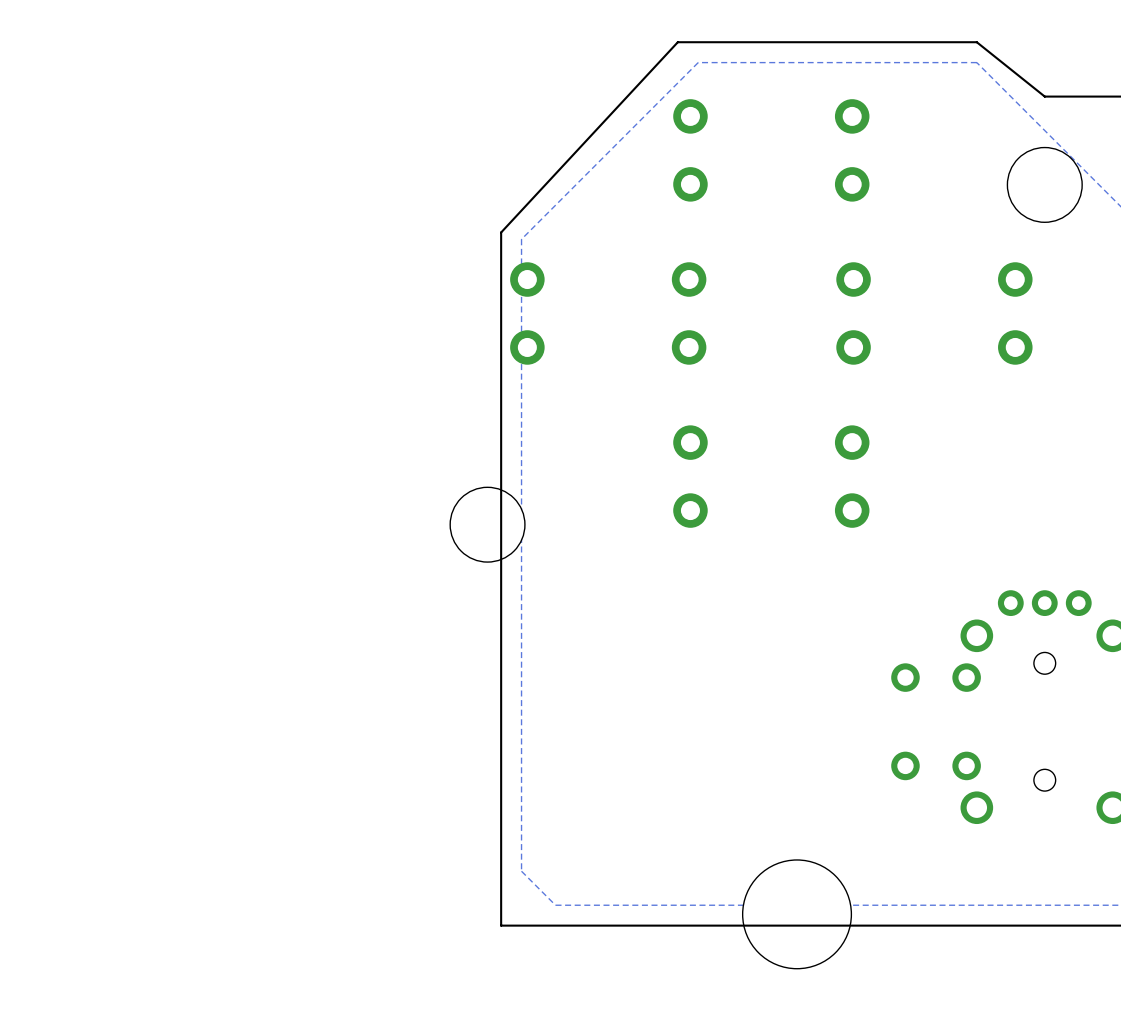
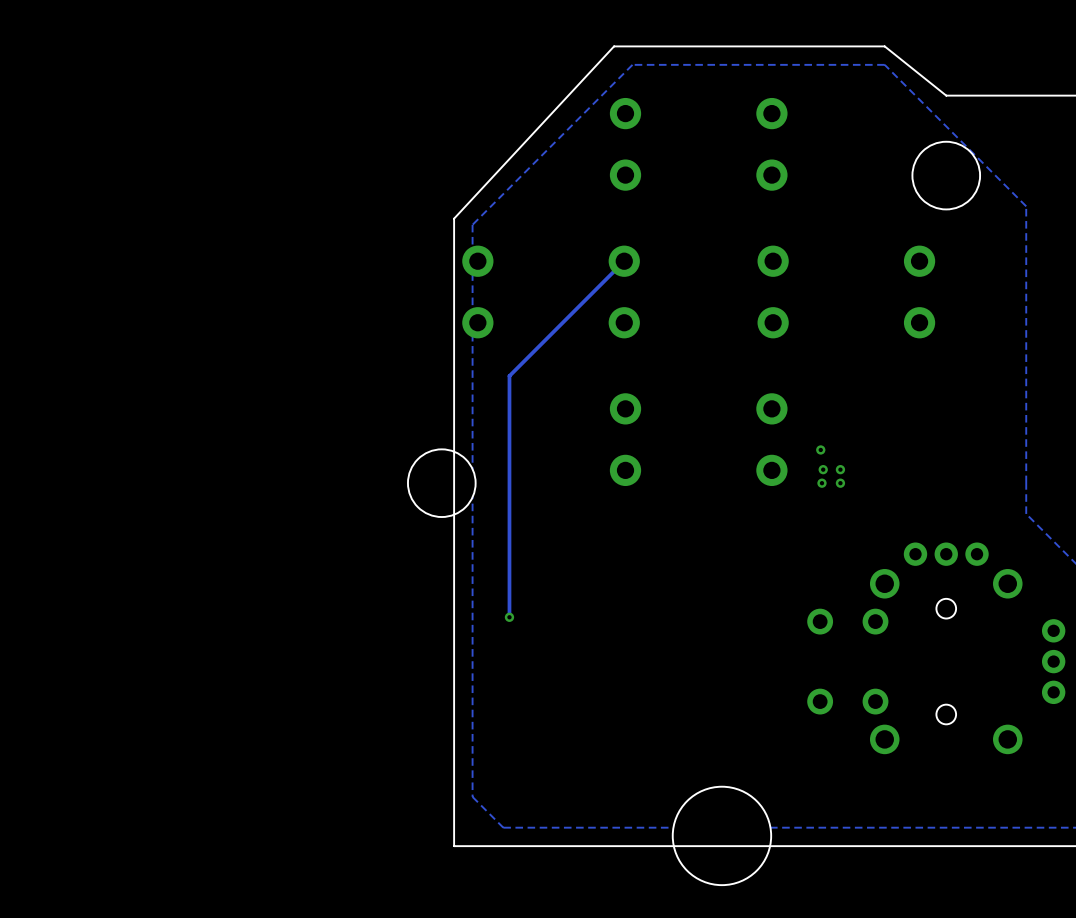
track: none -> (624, 261) (509, 376) (509, 617)
via: none -> (820, 449)
via: none -> (823, 469)
via: none -> (840, 469)
via: none -> (821, 483)
via: none -> (840, 483)
via: none -> (509, 617)

